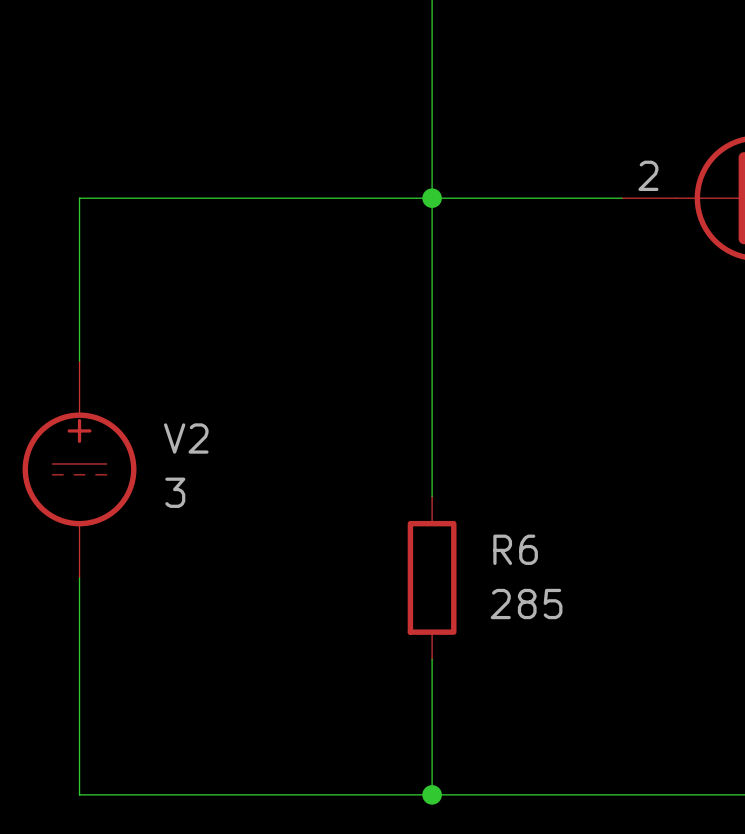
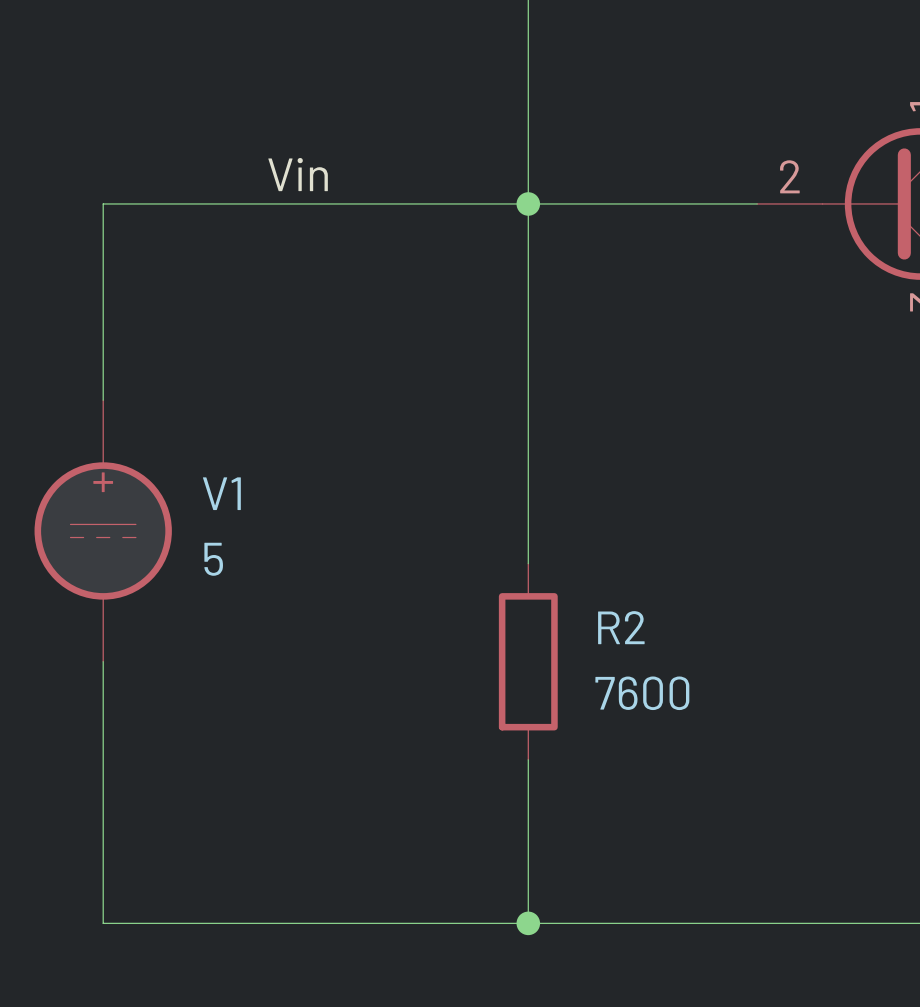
label: none -> Vin (298, 174)
V2 name: V2 (186, 438) -> V1 (221, 493)
V2 value: 3 (175, 492) -> 5 (213, 559)
R6 name: R6 (515, 549) -> R2 (621, 627)
R6 value: 285 (526, 604) -> 7600 (642, 693)

